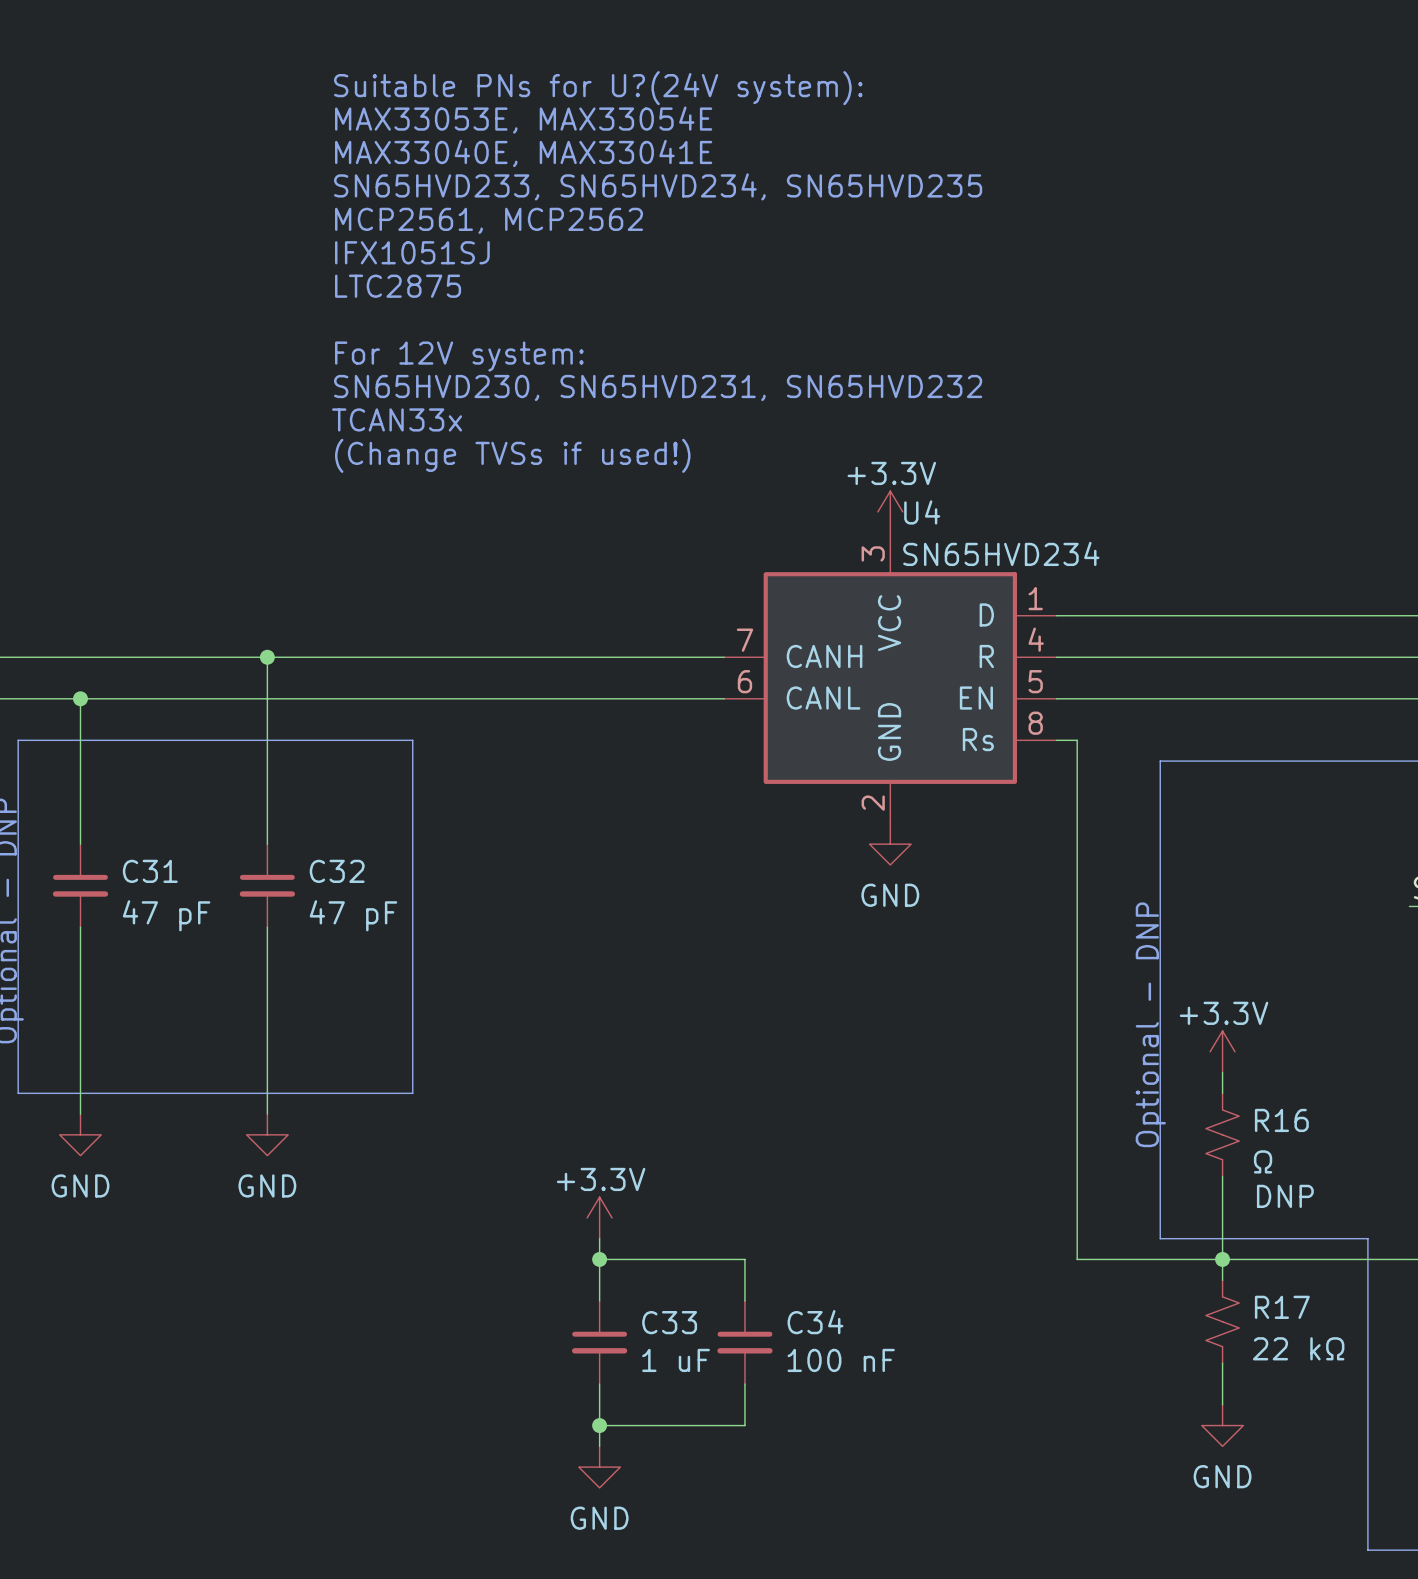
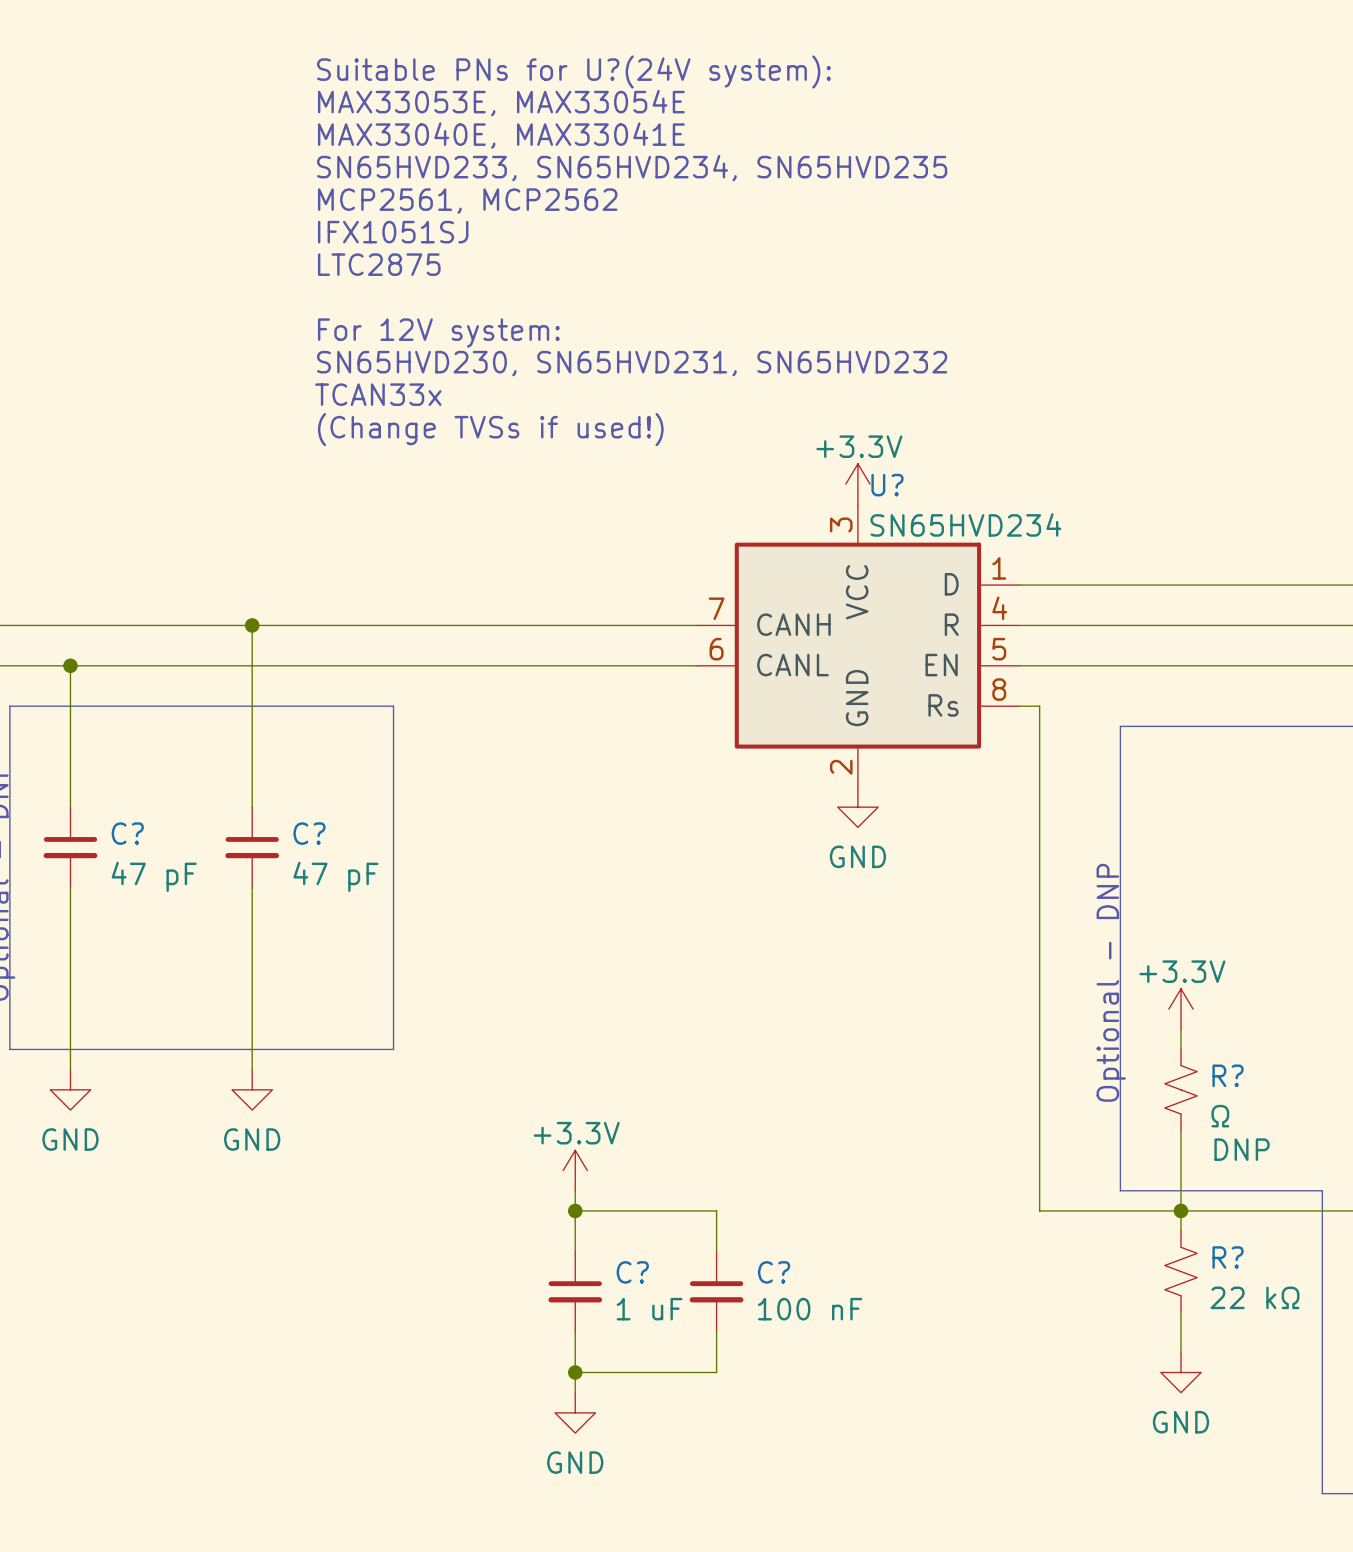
U4 name: U4 (922, 512) -> U? (887, 485)
C31 name: C31 (150, 871) -> C? (127, 833)
C32 name: C32 (337, 871) -> C? (309, 833)
R16 name: R16 (1281, 1120) -> R? (1228, 1075)
R17 name: R17 (1282, 1307) -> R? (1228, 1257)
C33 name: C33 (669, 1322) -> C? (632, 1272)
C34 name: C34 (815, 1322) -> C? (774, 1272)

